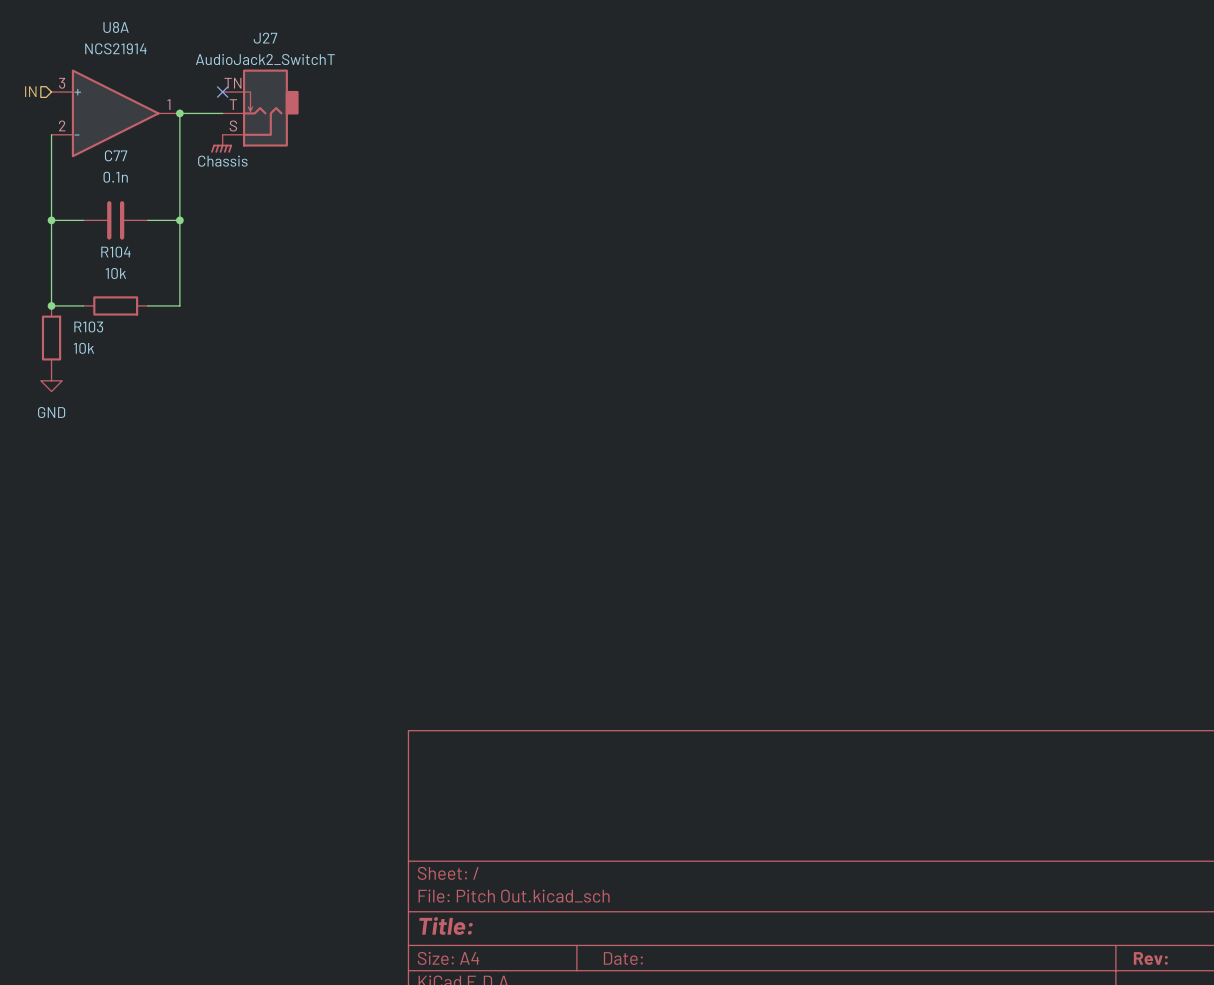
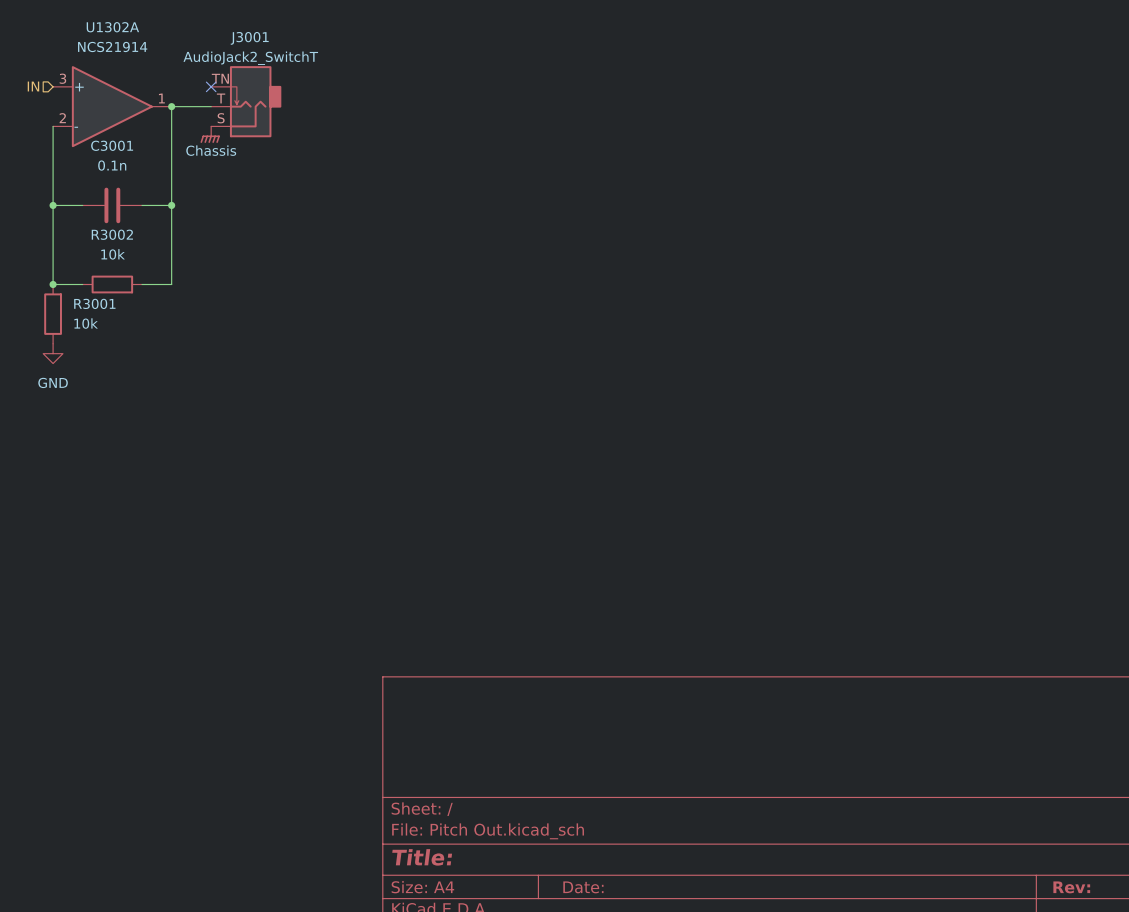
U8A name: U8A (116, 27) -> U1302A (112, 27)
J27 name: J27 (265, 38) -> J3001 (249, 38)
C77 name: C77 (116, 155) -> C3001 (112, 145)
R104 name: R104 (115, 252) -> R3002 (112, 234)
R103 name: R103 (88, 326) -> R3001 (94, 303)

